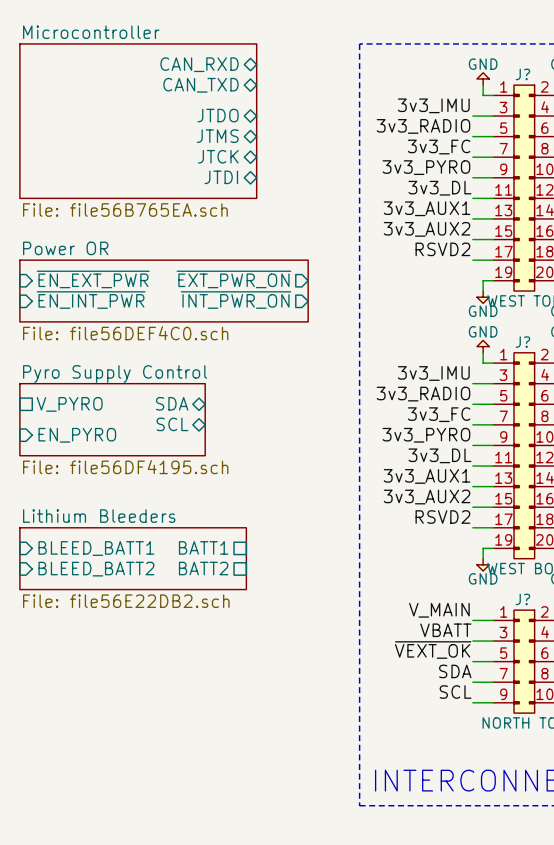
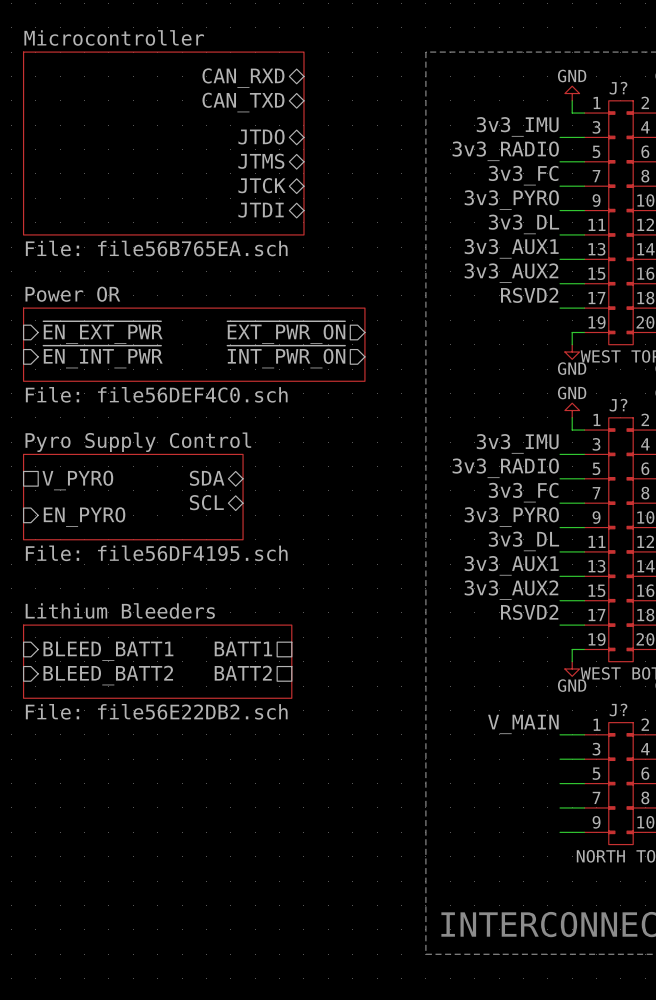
label: VBATT (445, 630) -> none
label: ~{VEXT_OK} (433, 650) -> none
label: SDA (455, 671) -> none
label: SCL (455, 692) -> none

